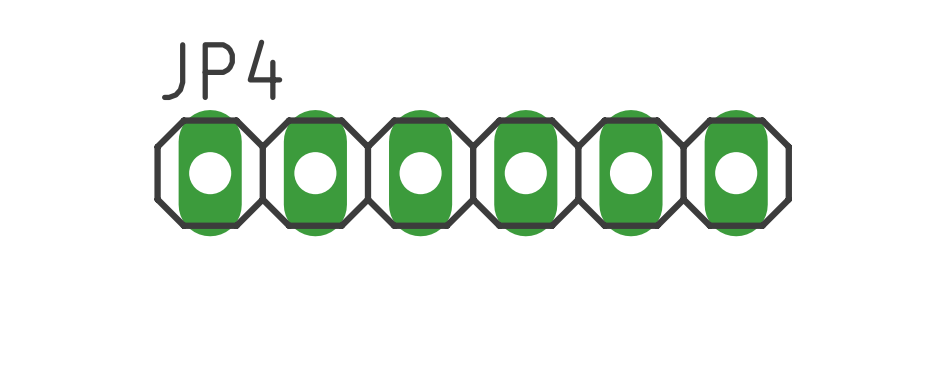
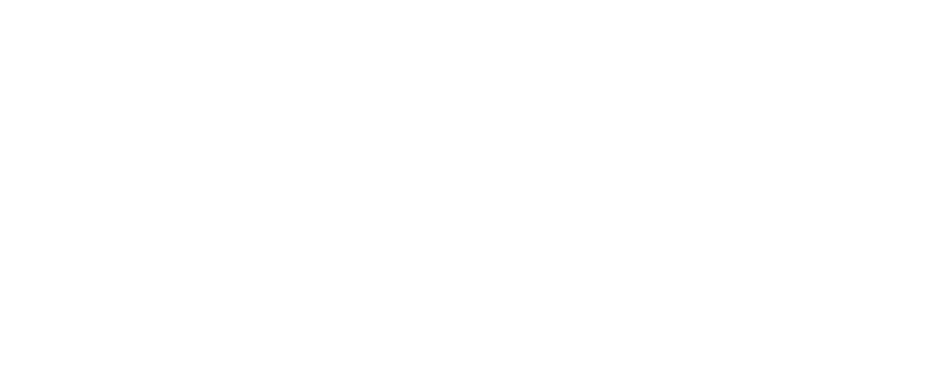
JP4: (473, 173) -> none

